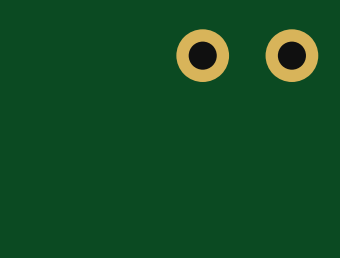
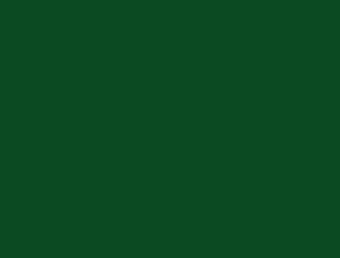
part: (247, 55) -> none

